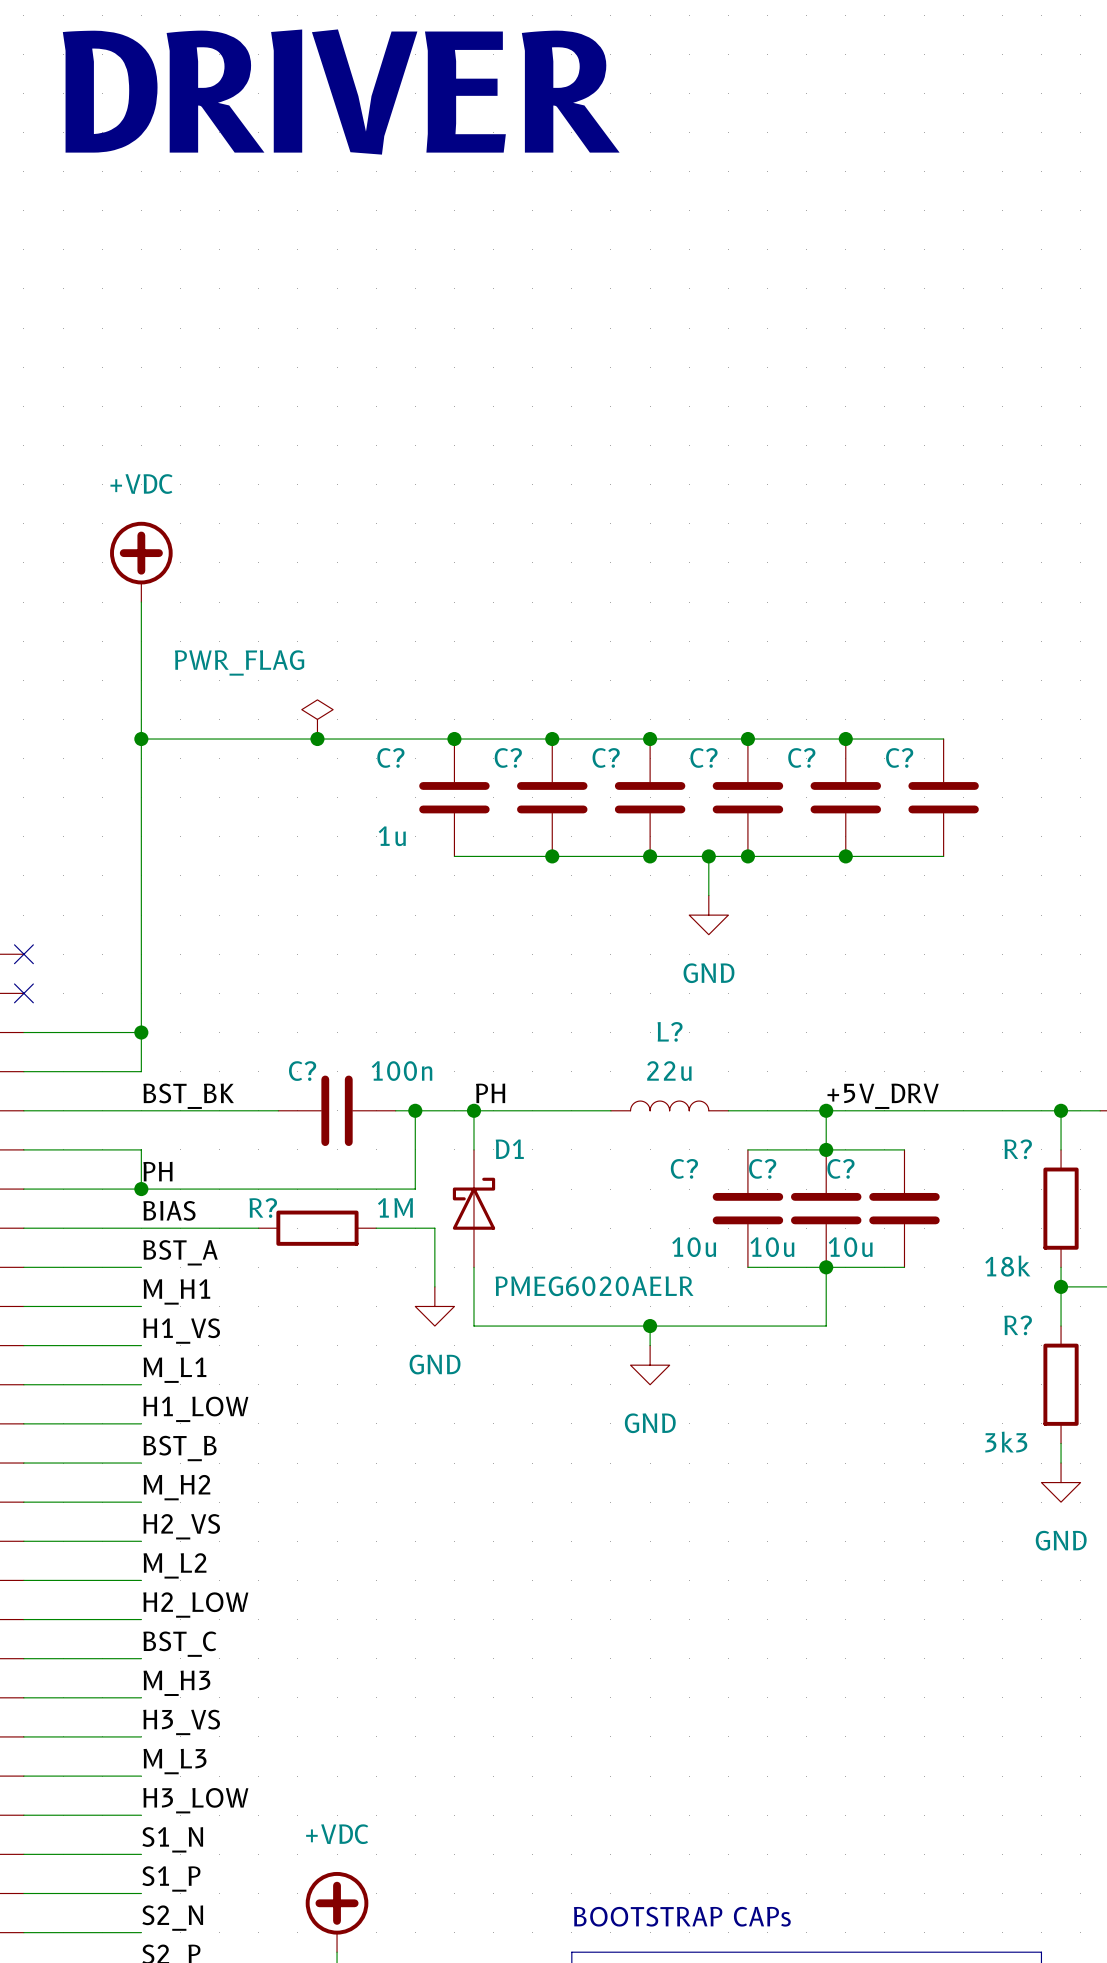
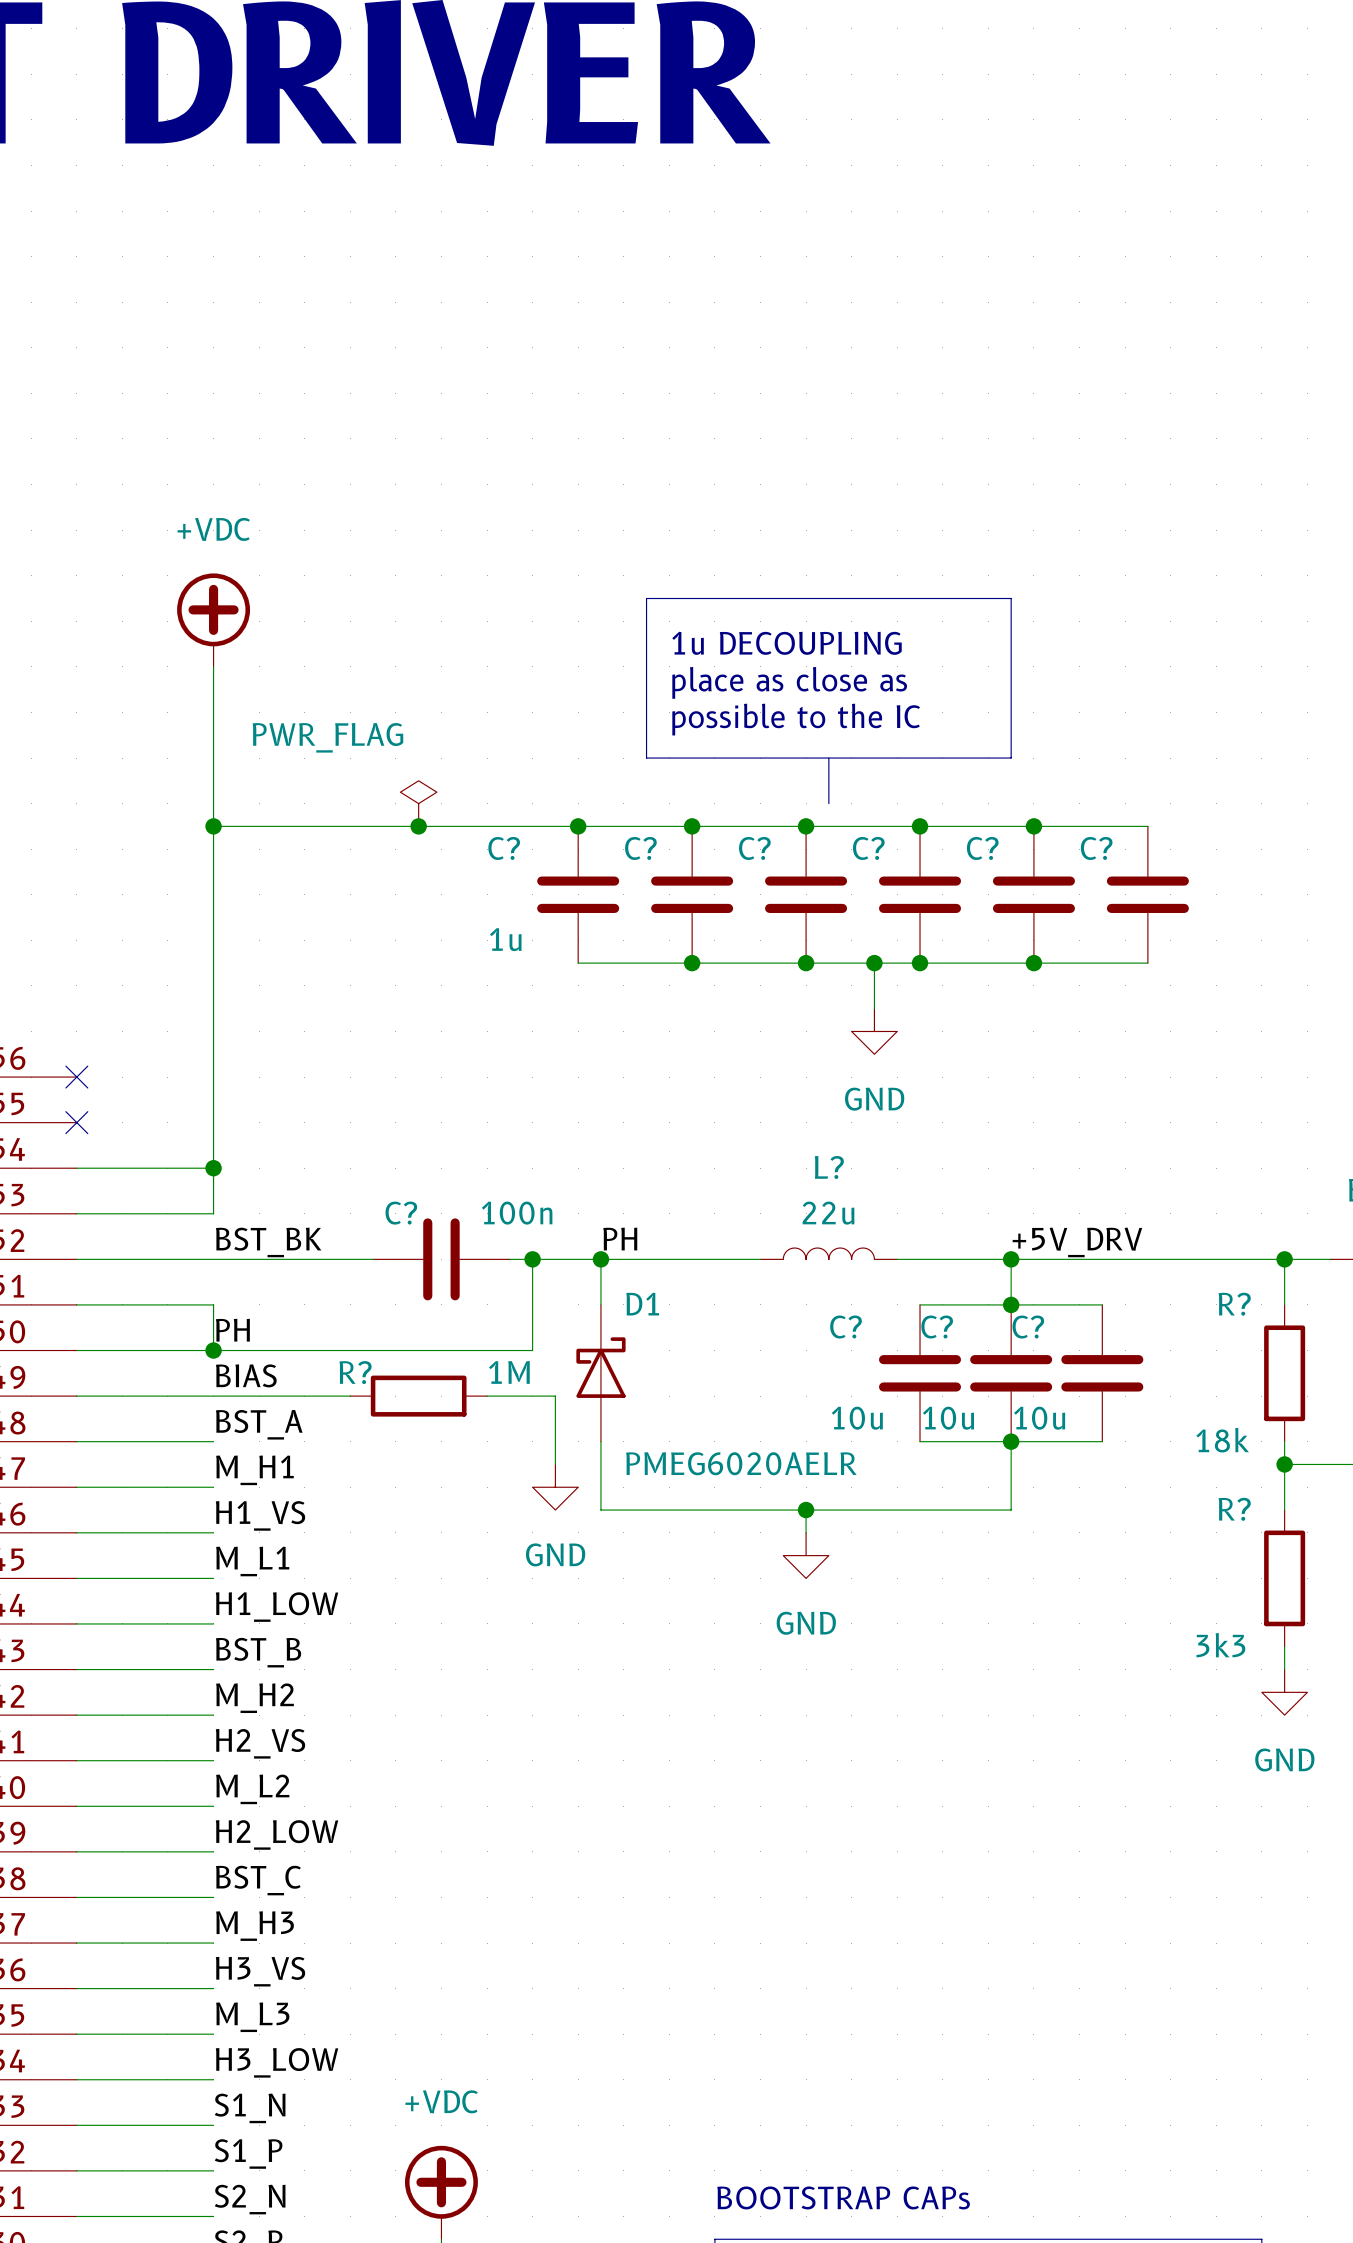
line: none -> (646, 598) (1011, 598) (1011, 758) (646, 758) (646, 598)
text: none -> 1u DECOUPLING (787, 643)
text: none -> place as close as (789, 682)
text: none -> possible to the IC (796, 719)
bus: none -> (828, 758) (828, 803)

